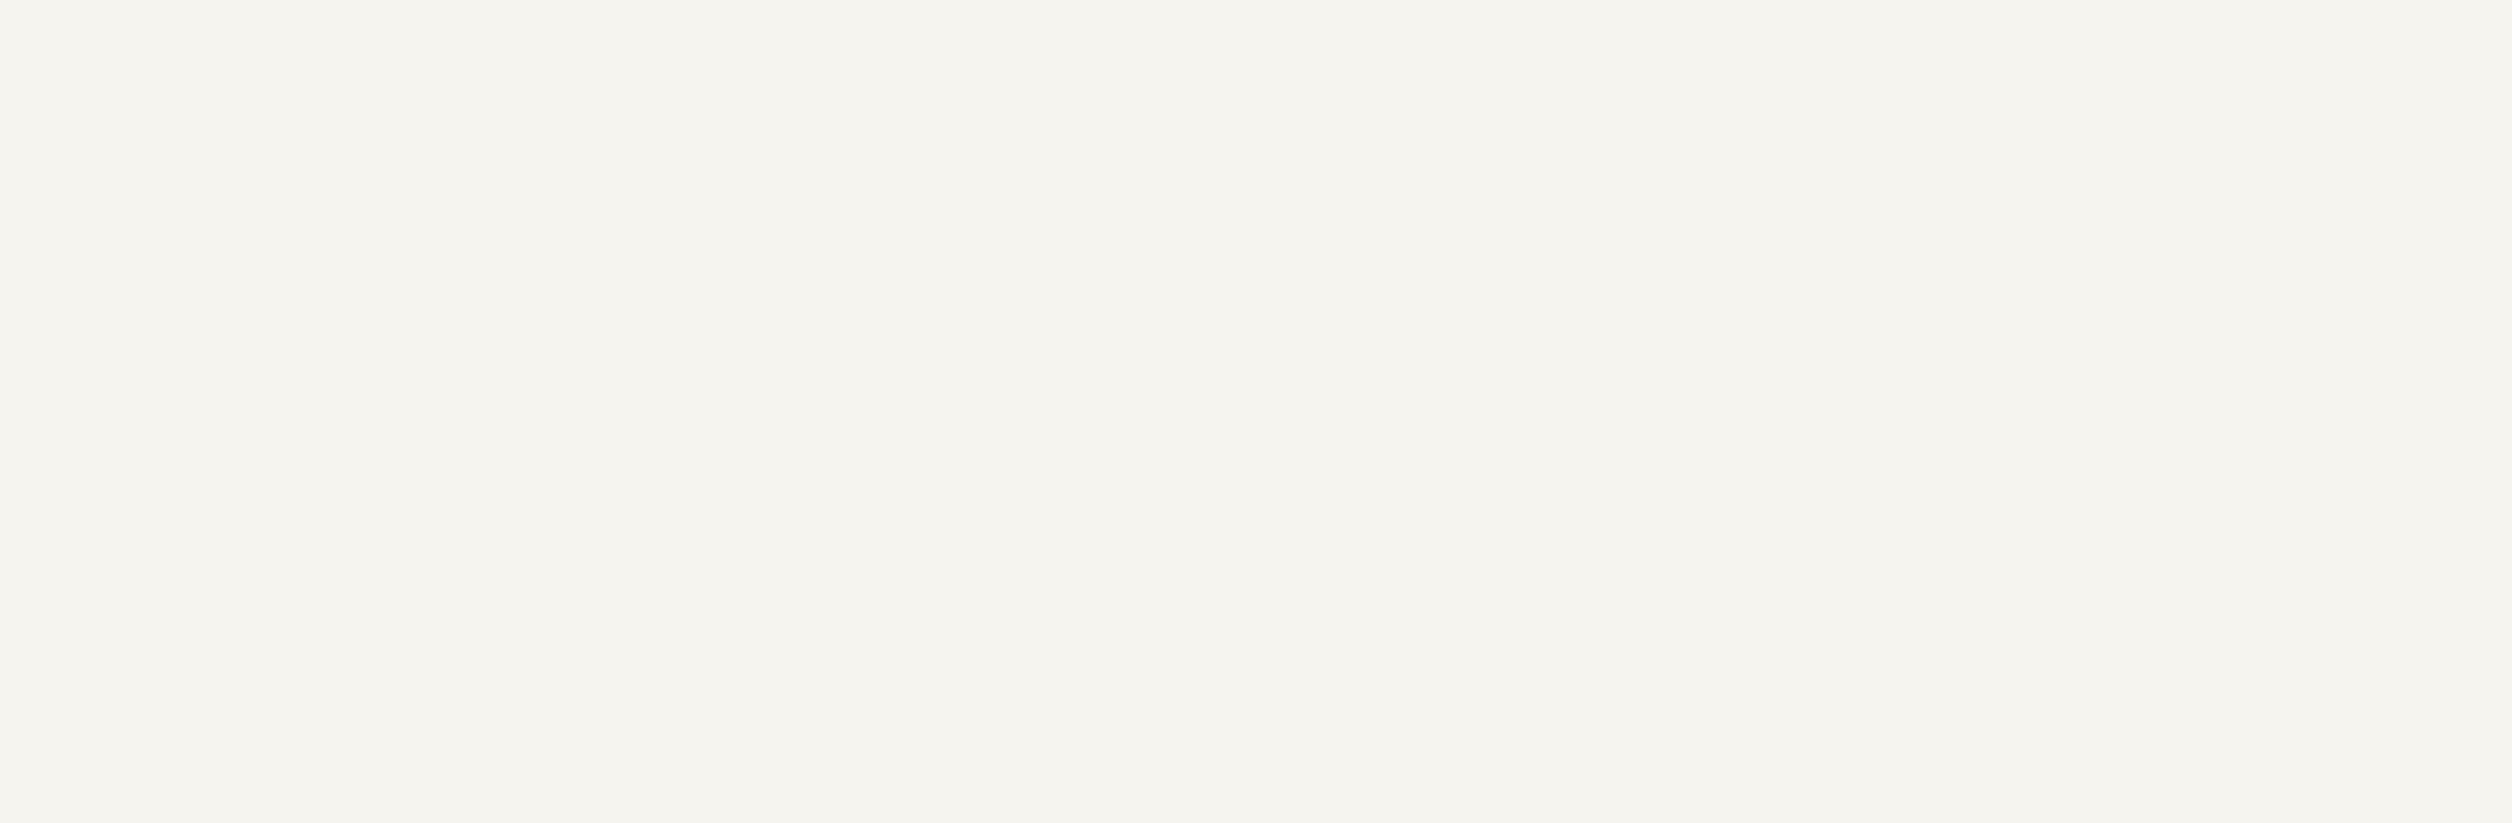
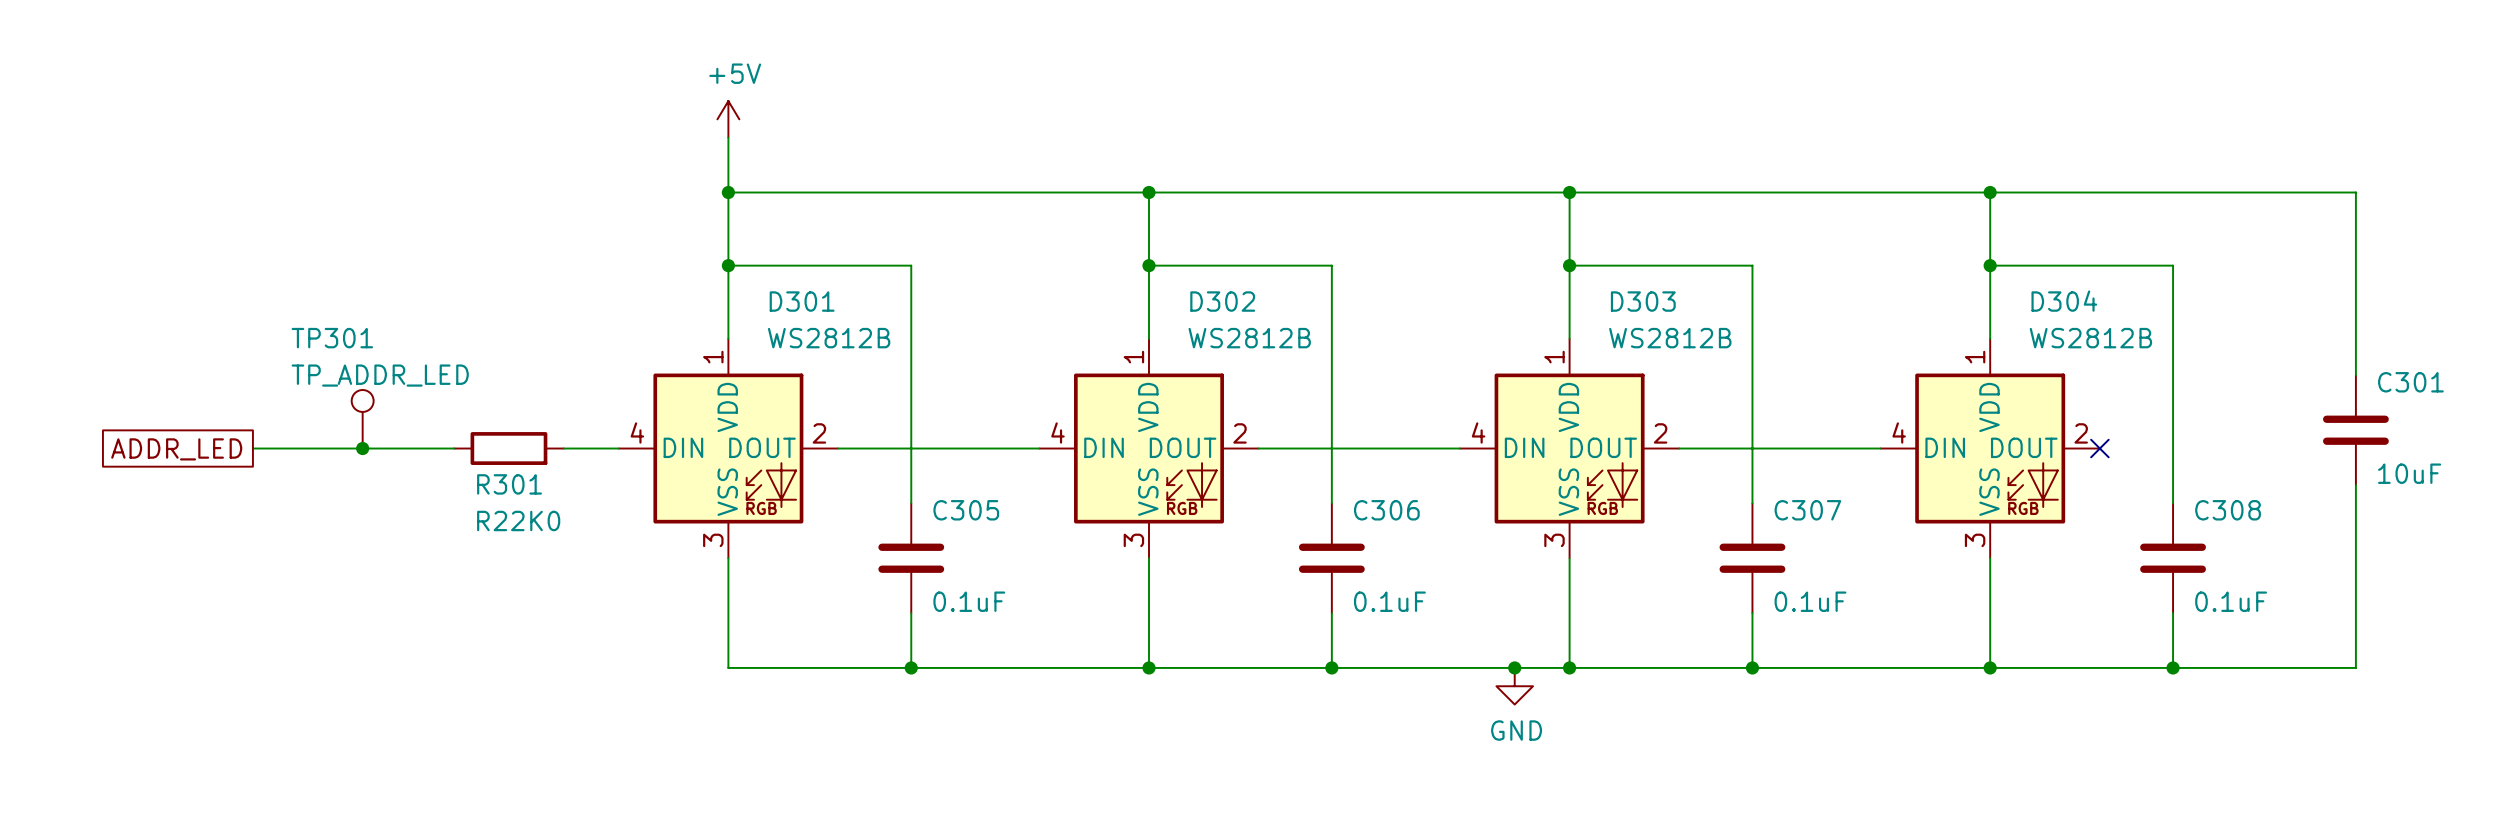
power symbol: none -> +5V (728, 119)
wire: none -> (728, 137) (728, 338)
wire: none -> (728, 192) (2355, 192) (2355, 375)
junction: none -> (728, 192)
wire: none -> (1148, 192) (1148, 338)
junction: none -> (1148, 192)
wire: none -> (1569, 192) (1569, 338)
junction: none -> (1569, 192)
wire: none -> (1990, 192) (1990, 338)
junction: none -> (1990, 192)
wire: none -> (728, 265) (911, 265) (911, 503)
junction: none -> (728, 265)
wire: none -> (1148, 265) (1331, 265) (1331, 503)
junction: none -> (1148, 265)
wire: none -> (1569, 265) (1752, 265) (1752, 503)
junction: none -> (1569, 265)
wire: none -> (1990, 265) (2173, 265) (2173, 503)
junction: none -> (1990, 265)
TP301: none -> TP_ADDR_LED (362, 419)
C301: none -> 10uF (2355, 430)
wire: none -> (252, 448) (454, 448)
junction: none -> (362, 448)
R301: none -> R22K0 (508, 448)
wire: none -> (563, 448) (618, 448)
D301: none -> WS2812B (728, 448)
wire: none -> (838, 448) (1039, 448)
D302: none -> WS2812B (1148, 448)
wire: none -> (1258, 448) (1459, 448)
D303: none -> WS2812B (1569, 448)
wire: none -> (1679, 448) (1880, 448)
D304: none -> WS2812B (1990, 448)
no-connect mark: none -> (2099, 448)
global label: none -> ADDR_LED (176, 449)
wire: none -> (2355, 485) (2355, 667) (728, 667) (728, 558)
C305: none -> 0.1uF (911, 558)
wire: none -> (1148, 558) (1148, 667)
C306: none -> 0.1uF (1331, 558)
wire: none -> (1569, 558) (1569, 667)
C307: none -> 0.1uF (1752, 558)
wire: none -> (1990, 558) (1990, 667)
C308: none -> 0.1uF (2173, 558)
wire: none -> (911, 613) (911, 667)
wire: none -> (1331, 613) (1331, 667)
wire: none -> (1752, 613) (1752, 667)
wire: none -> (2173, 613) (2173, 667)
junction: none -> (911, 667)
junction: none -> (1148, 667)
junction: none -> (1331, 667)
junction: none -> (1514, 667)
junction: none -> (1569, 667)
junction: none -> (1752, 667)
junction: none -> (1990, 667)
junction: none -> (2173, 667)
power symbol: none -> GND (1514, 686)

